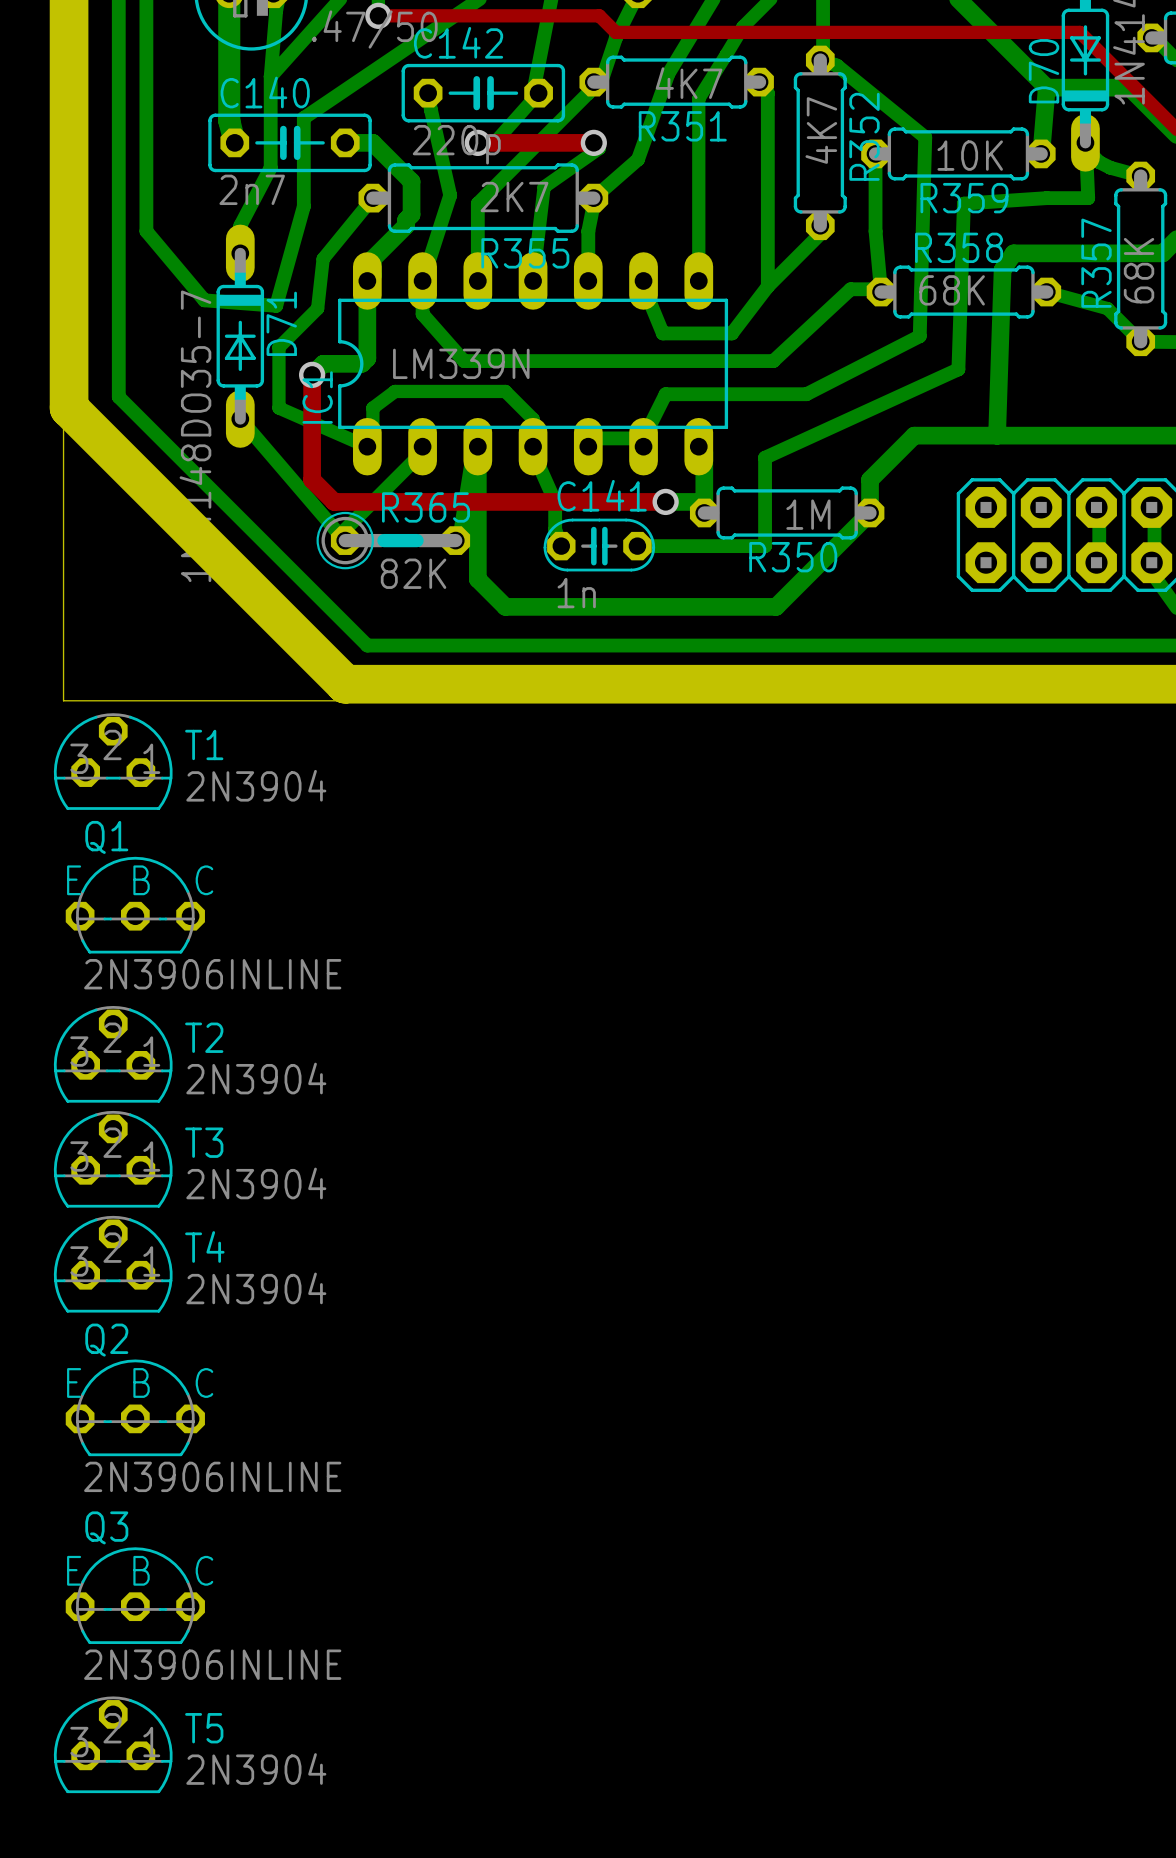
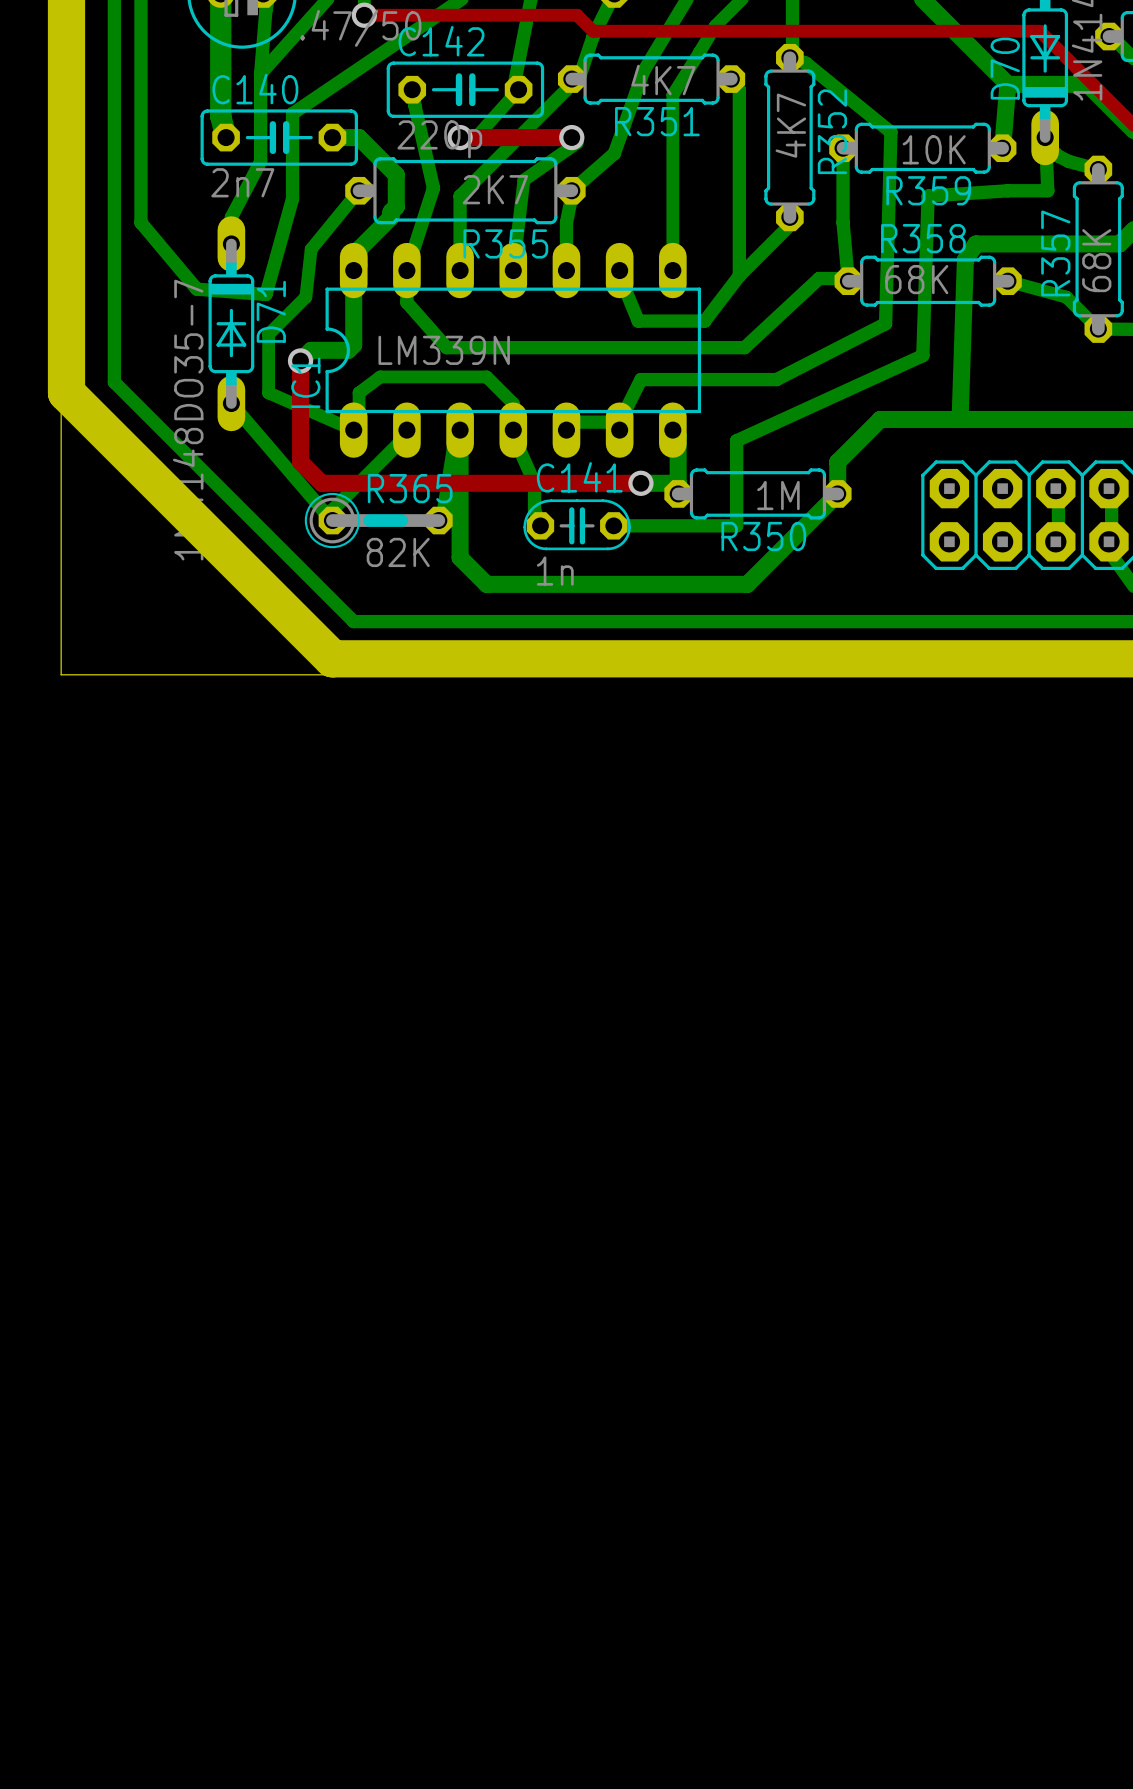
T1: 2N3904 (113, 761) -> none
Q1: 2N3906INLINE (135, 905) -> none
T2: 2N3904 (113, 1054) -> none
T3: 2N3904 (113, 1159) -> none
T4: 2N3904 (113, 1264) -> none
Q2: 2N3906INLINE (135, 1407) -> none
Q3: 2N3906INLINE (135, 1595) -> none
T5: 2N3904 (113, 1744) -> none

